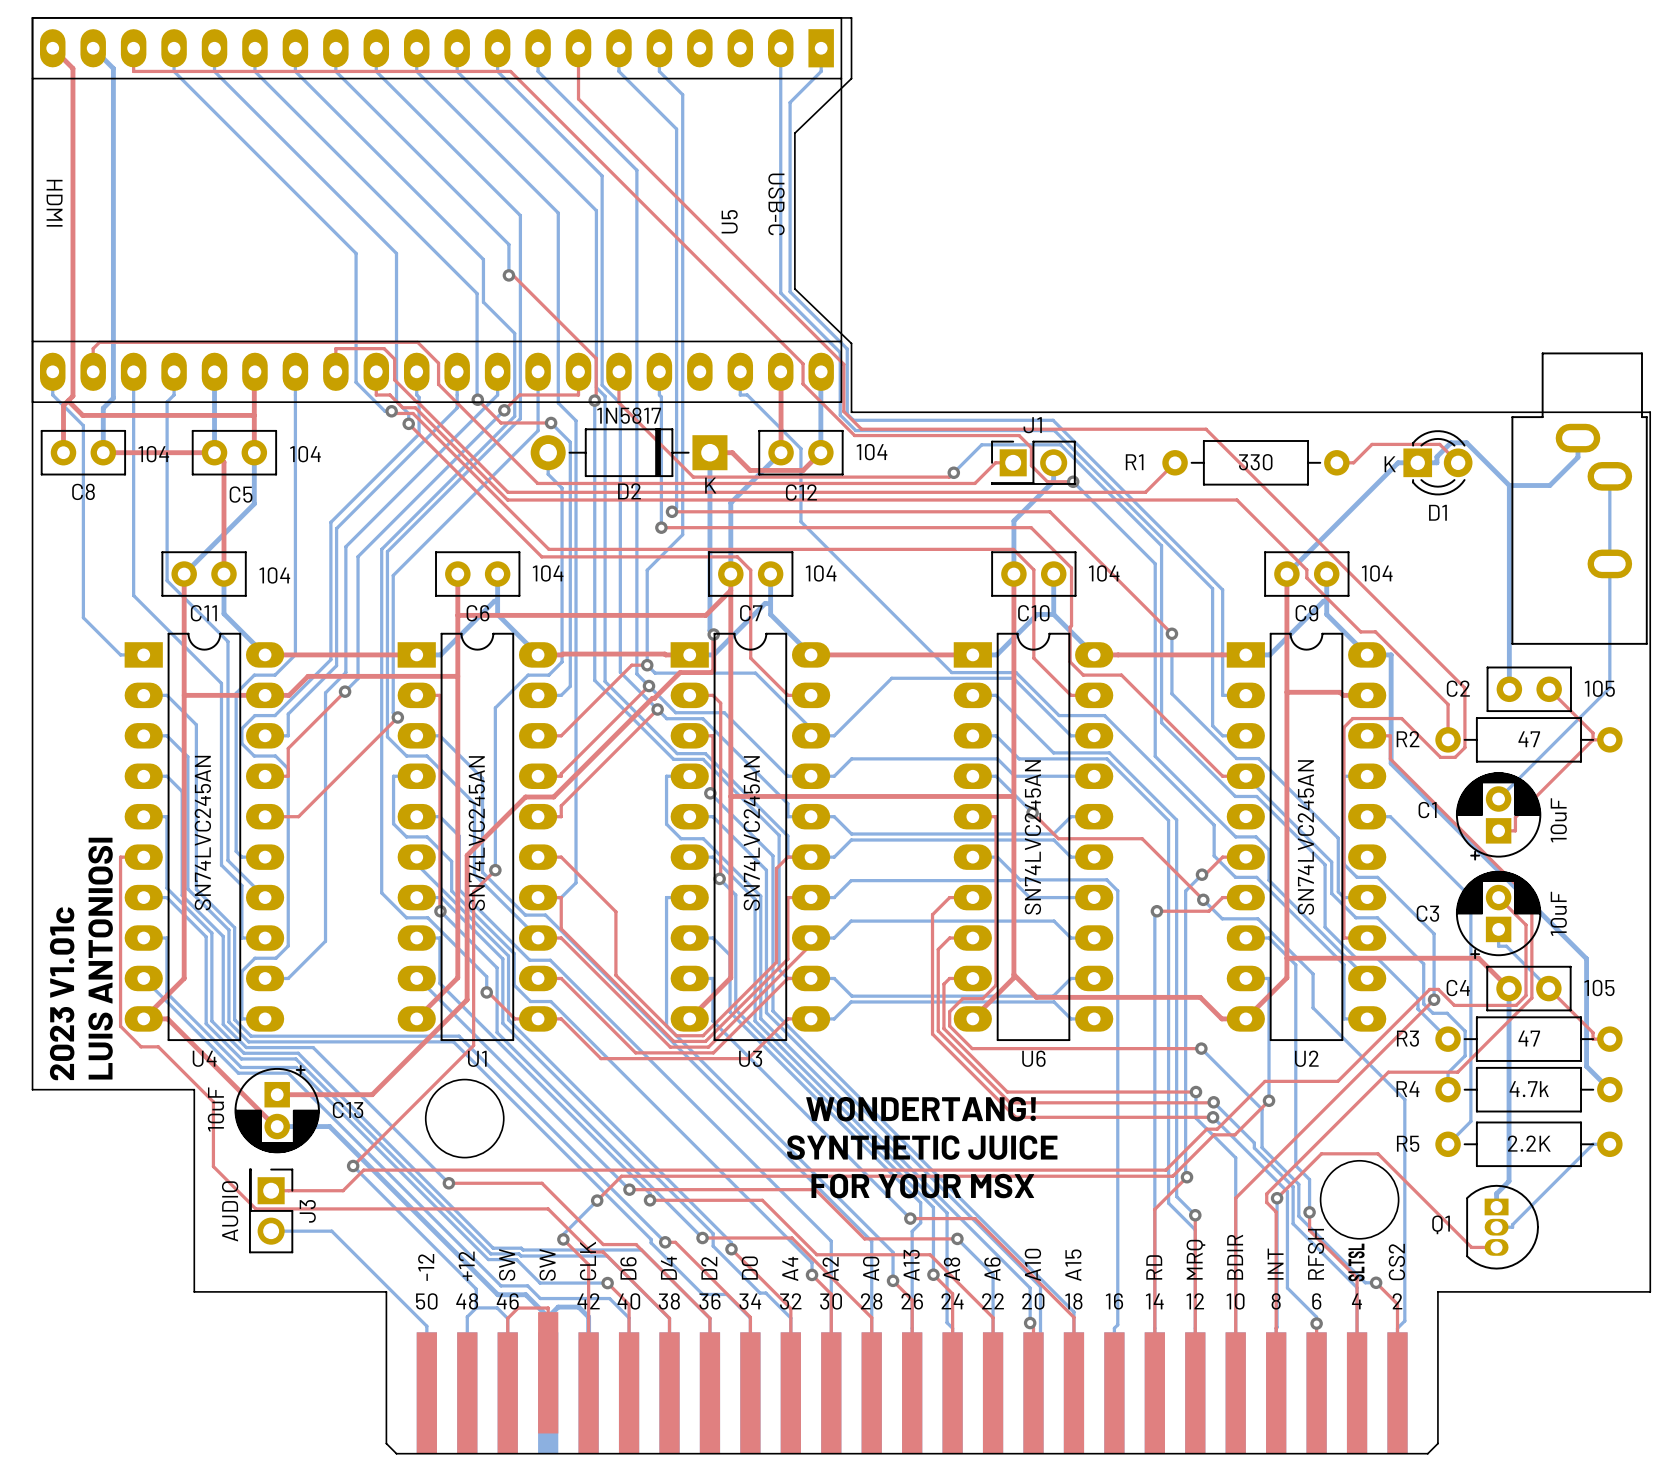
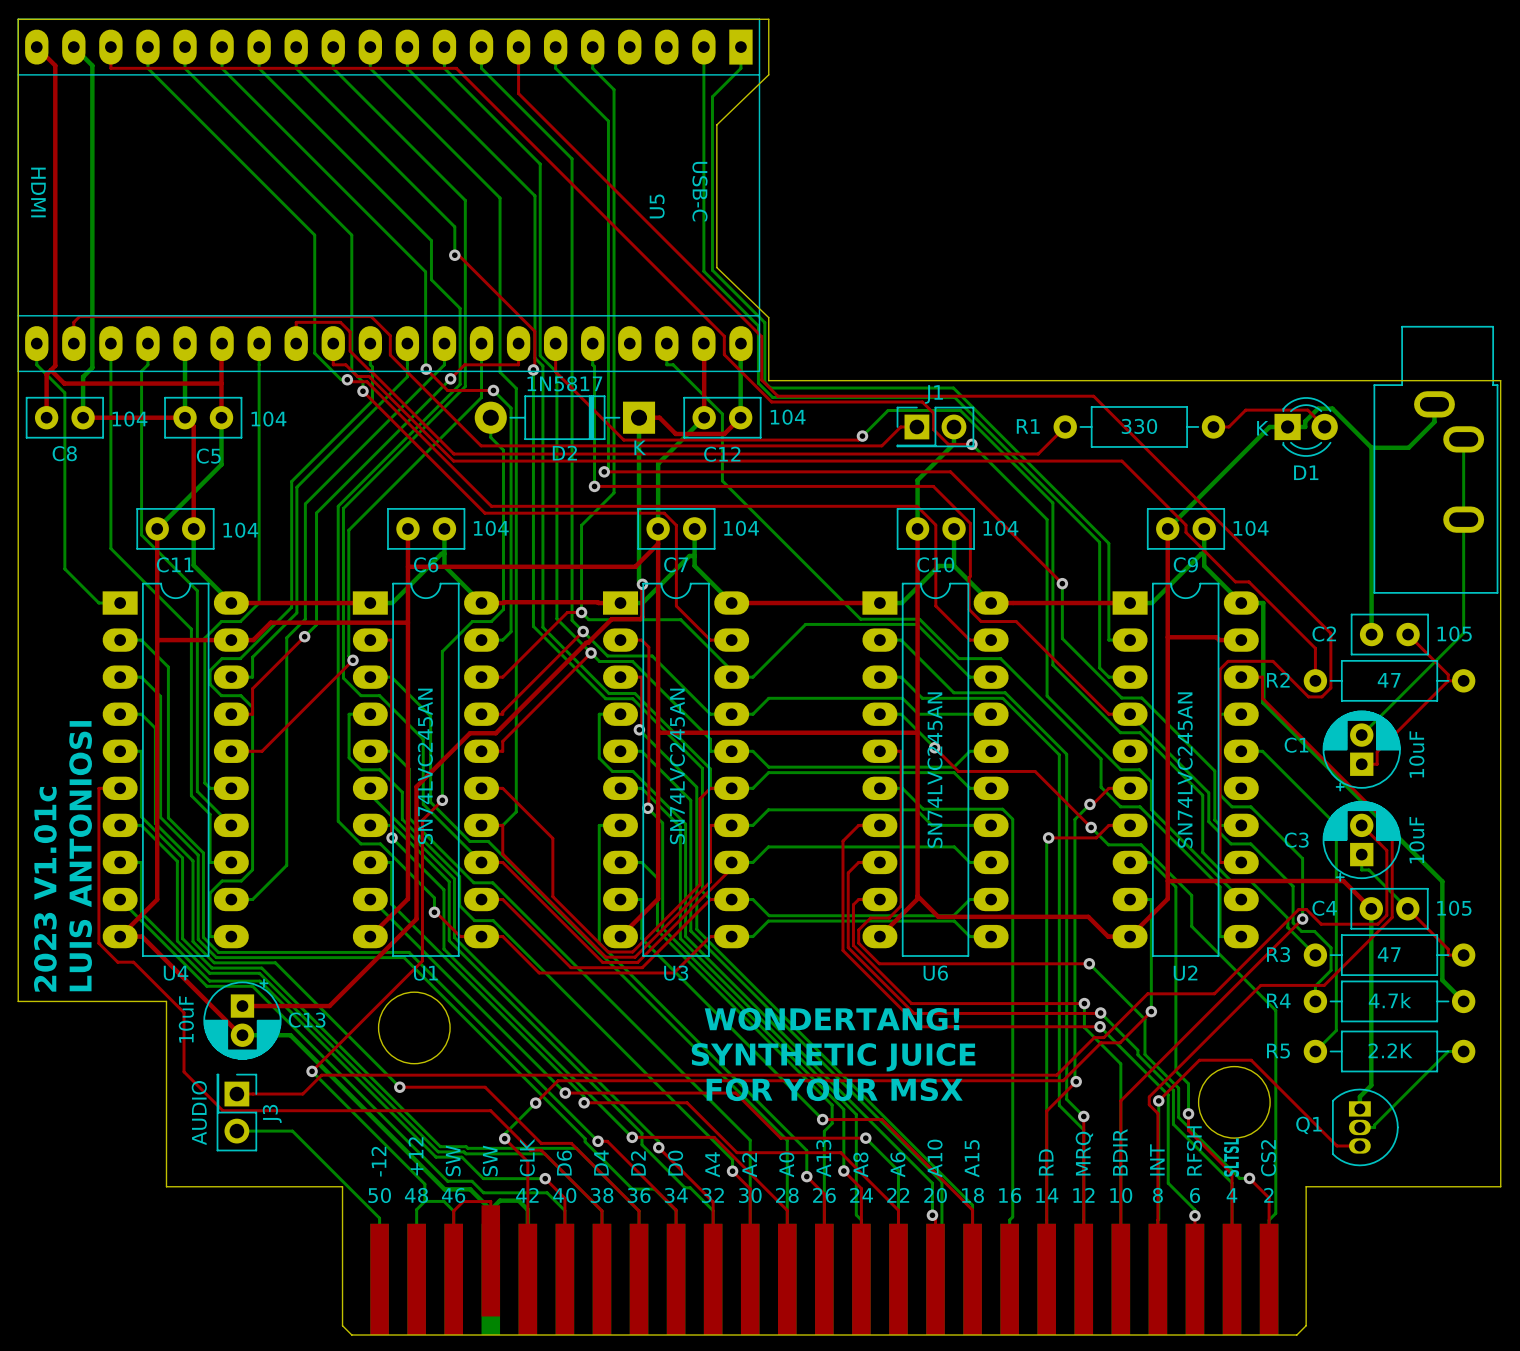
U4 value: SN74LVC245AN (202, 833) -> none

